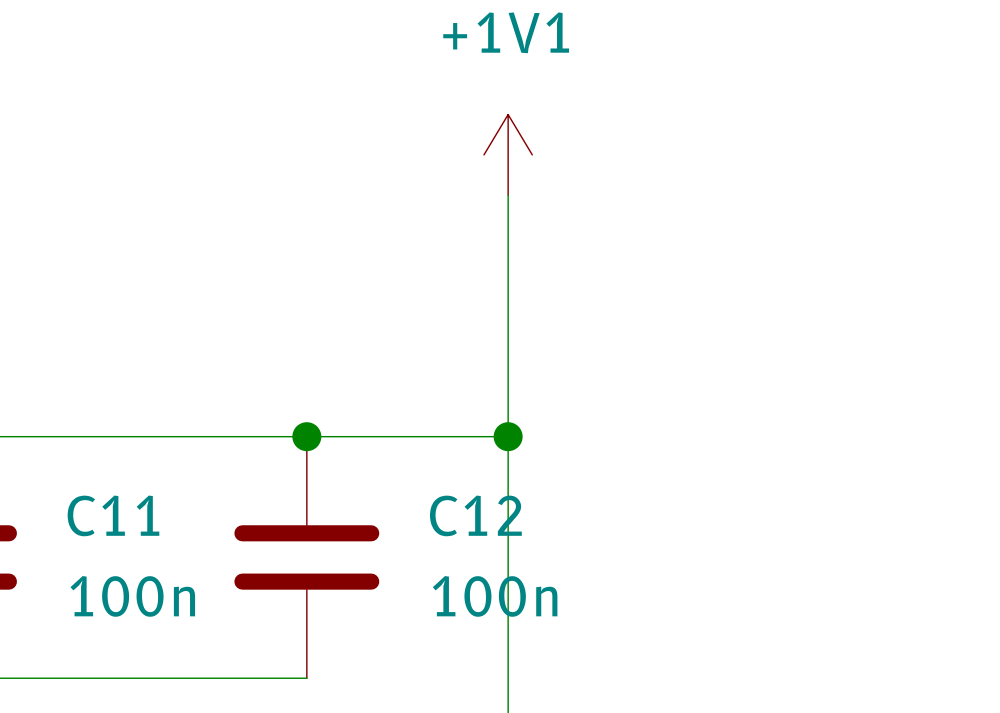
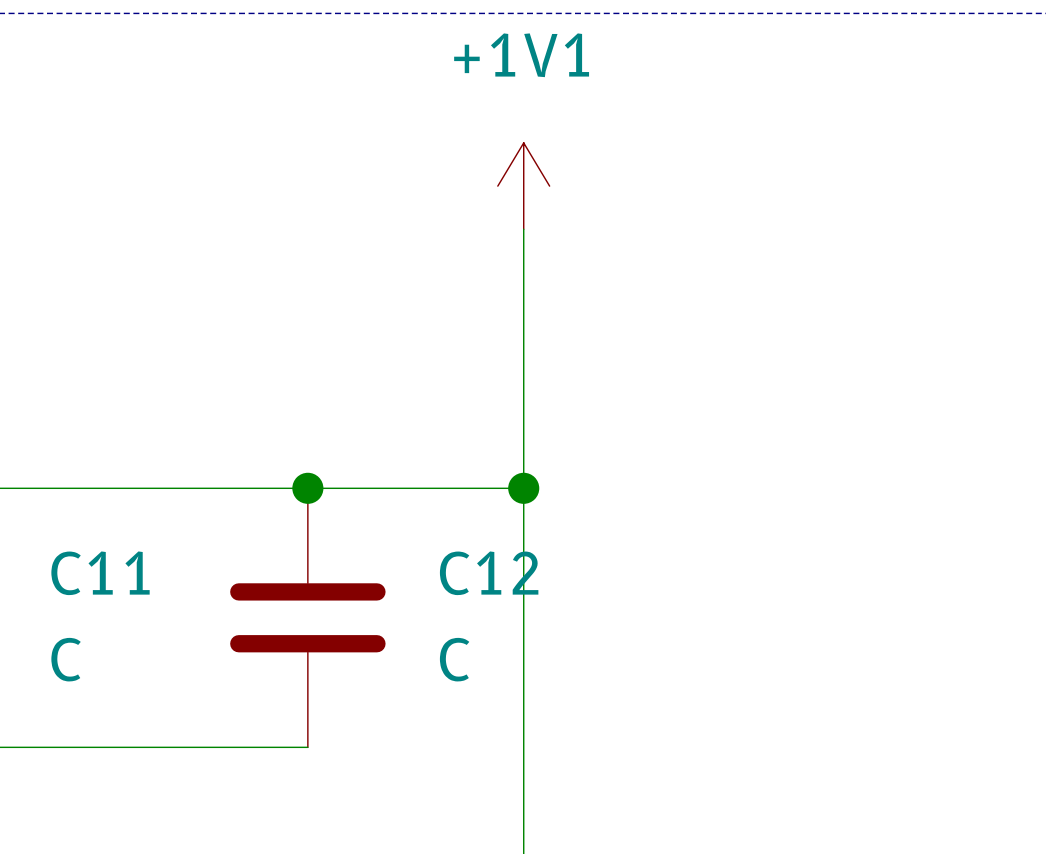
C11 value: 100n (132, 596) -> C (66, 659)
C12 value: 100n (495, 596) -> C (454, 659)

